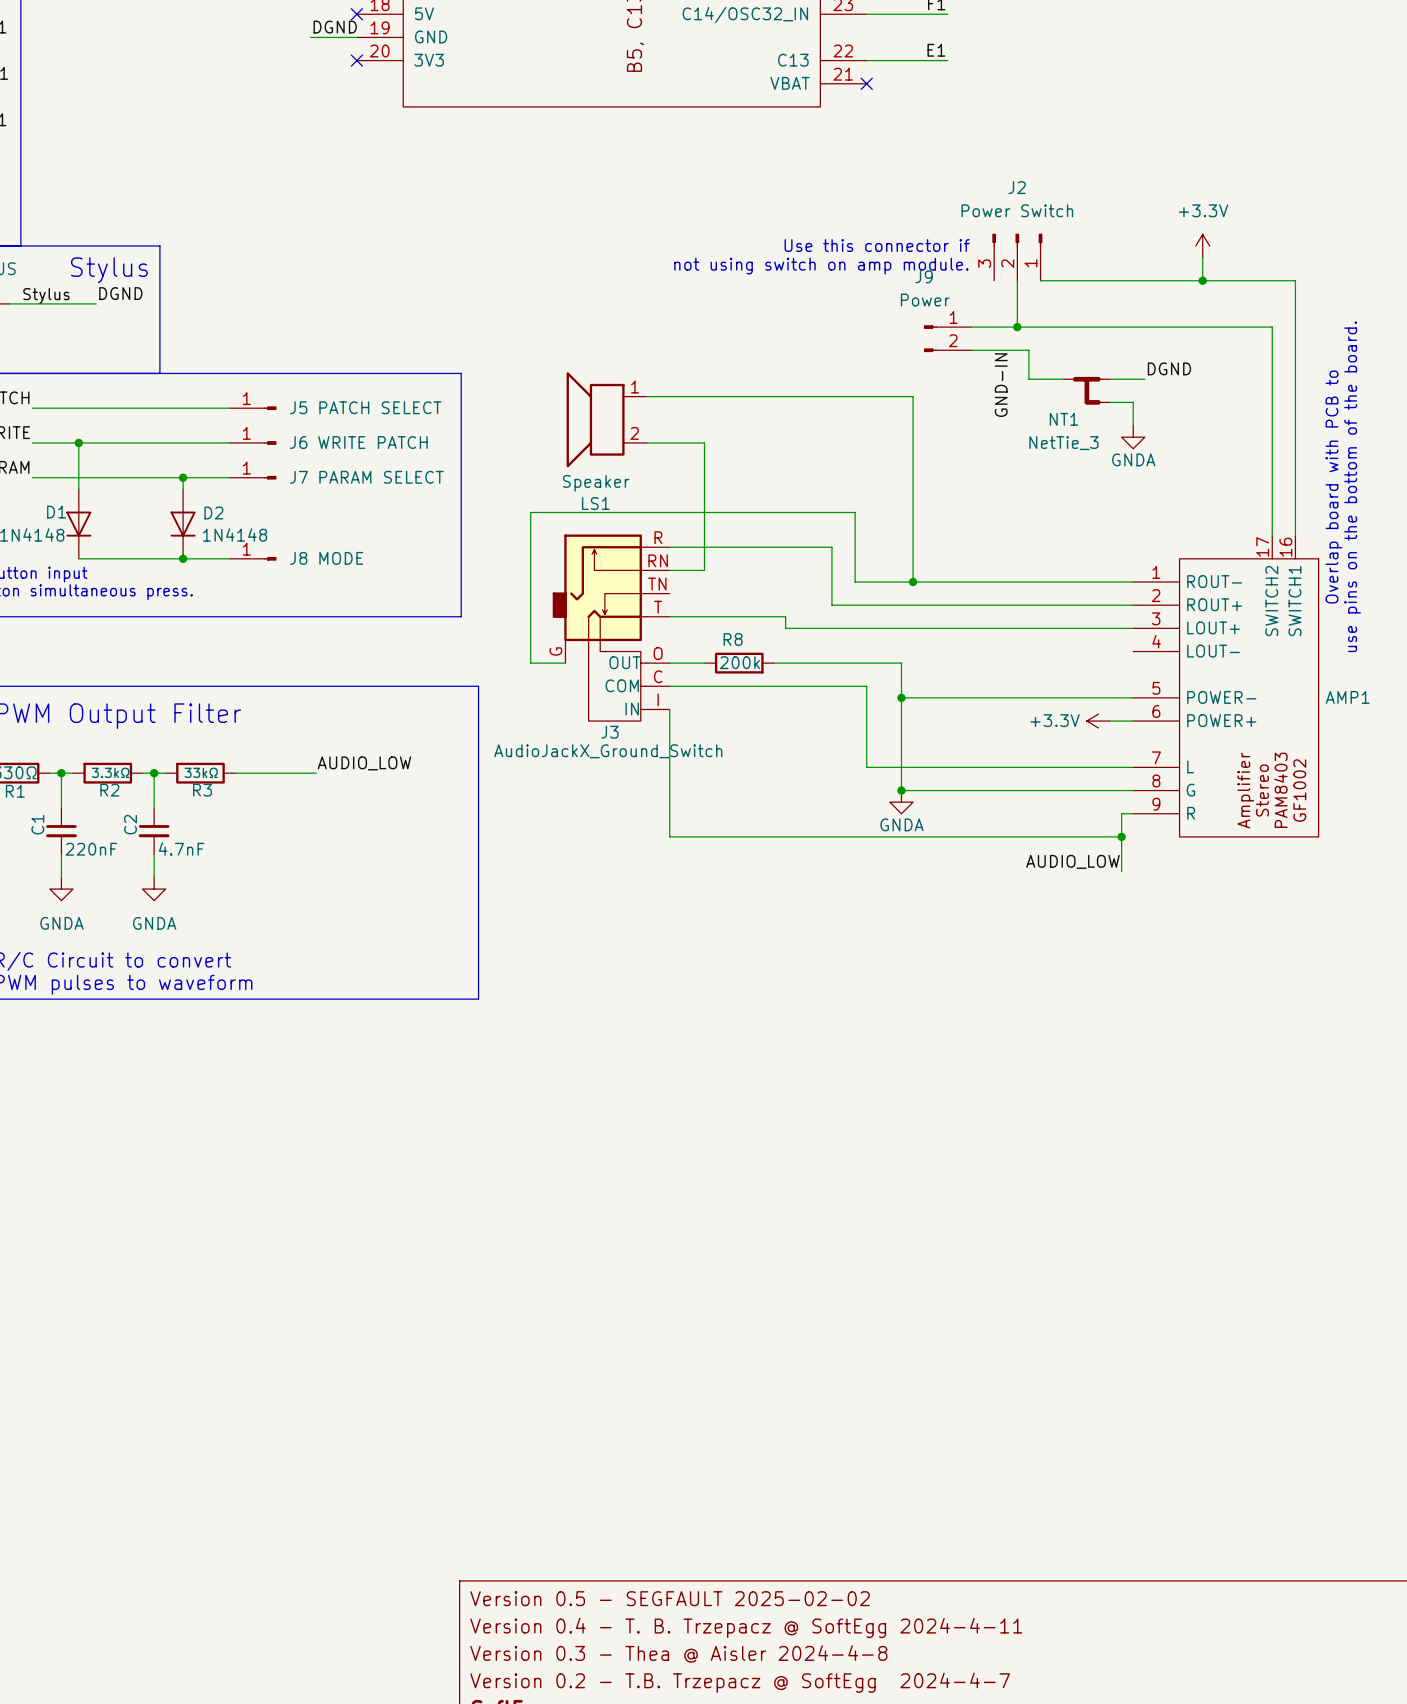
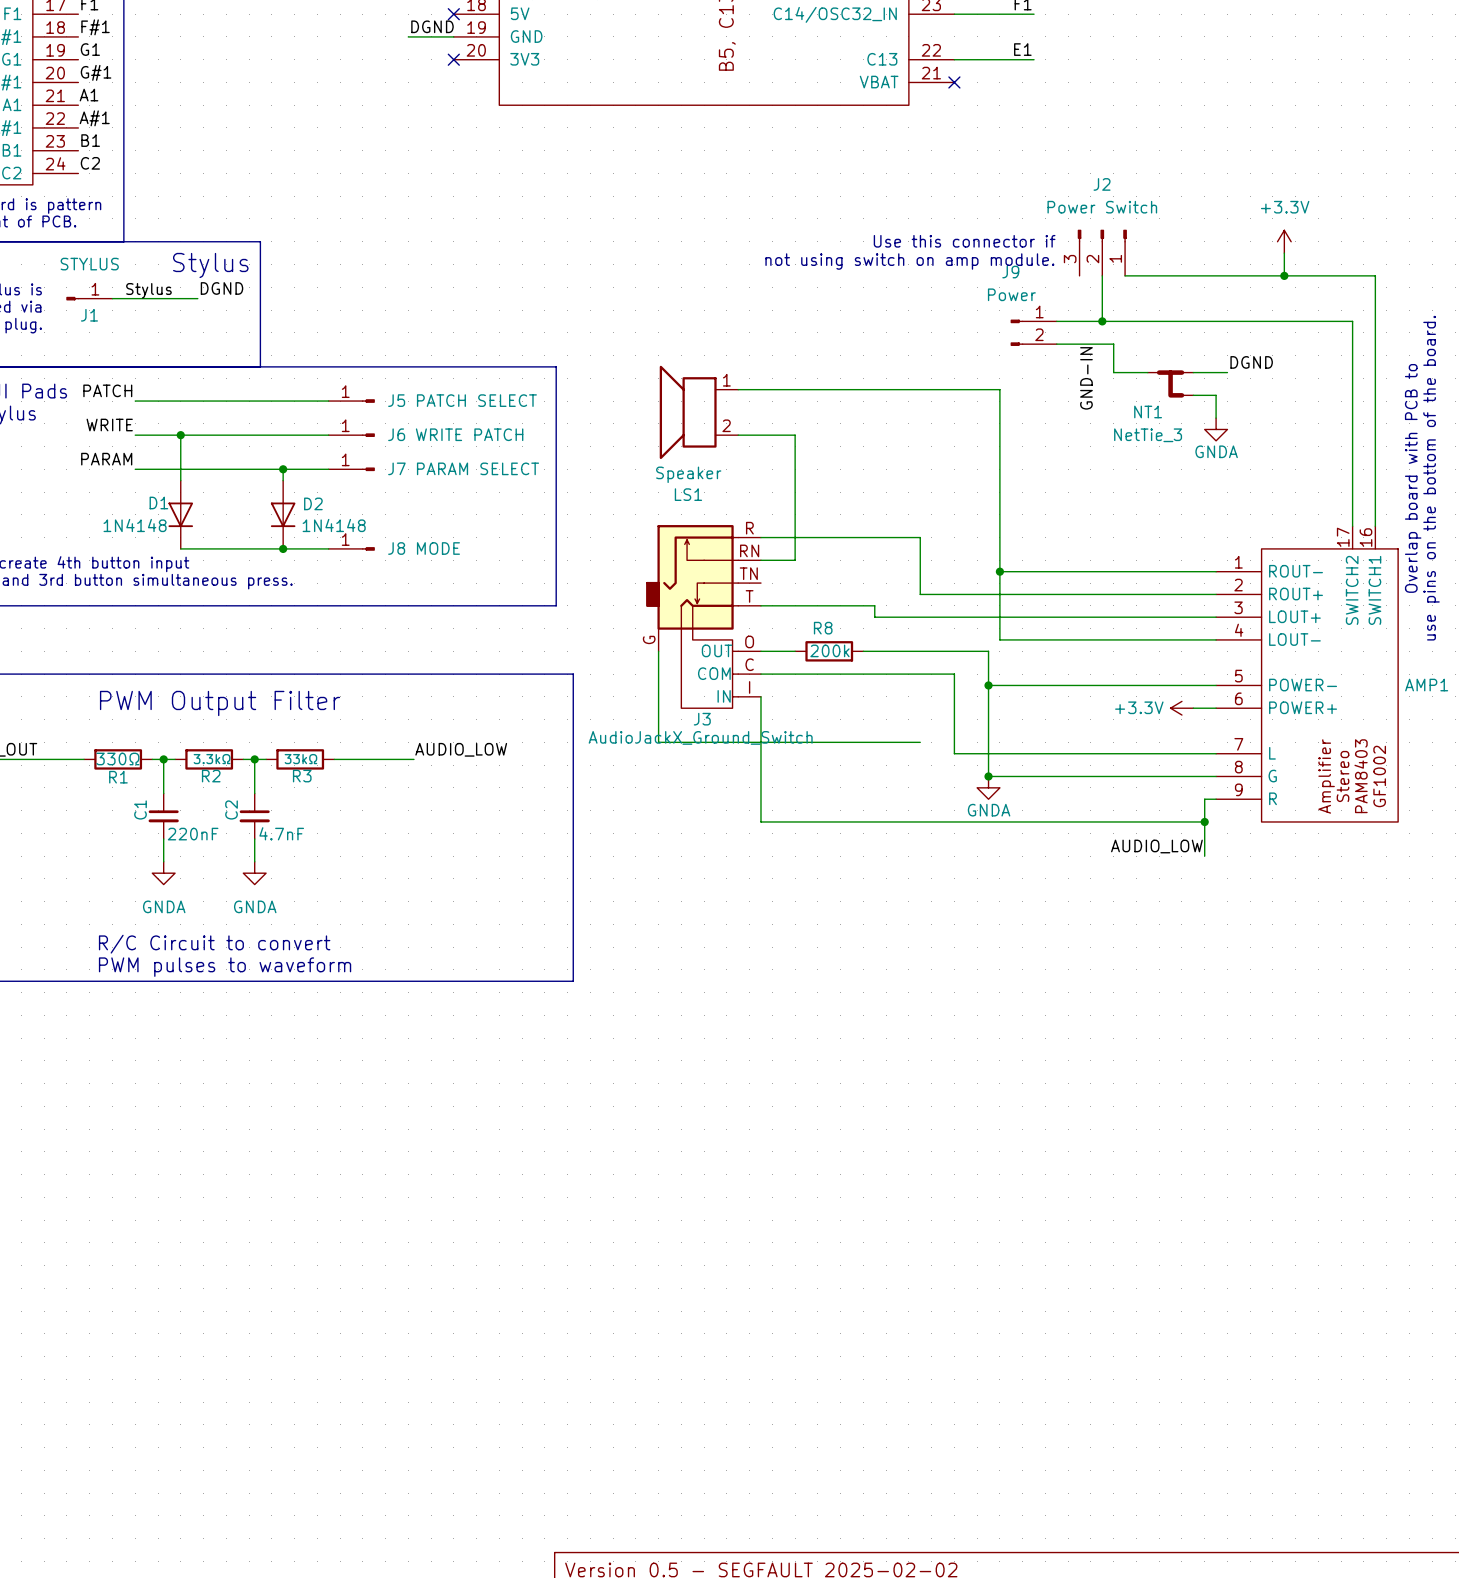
wire: (913, 582) (855, 582) (855, 512) (530, 512) (530, 663) (565, 663) -> (920, 742) (658, 742) (658, 651)
wire: none -> (999, 571) (999, 639) (1216, 639)

